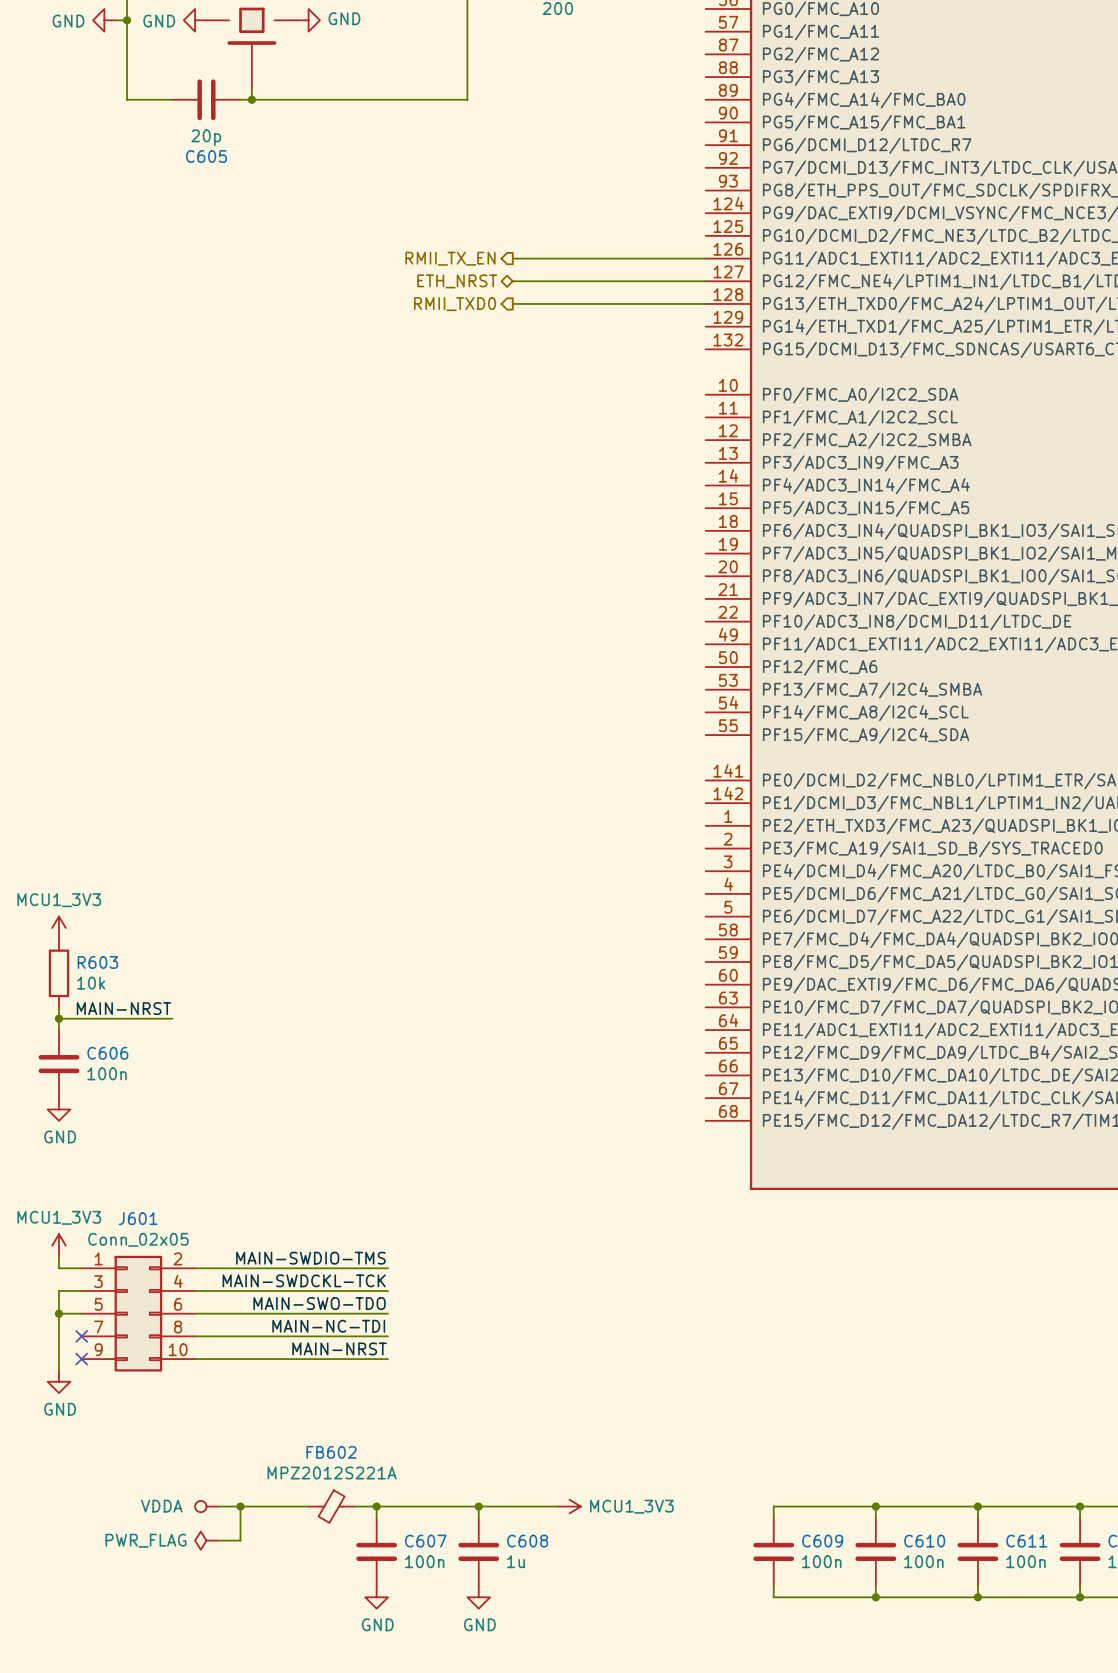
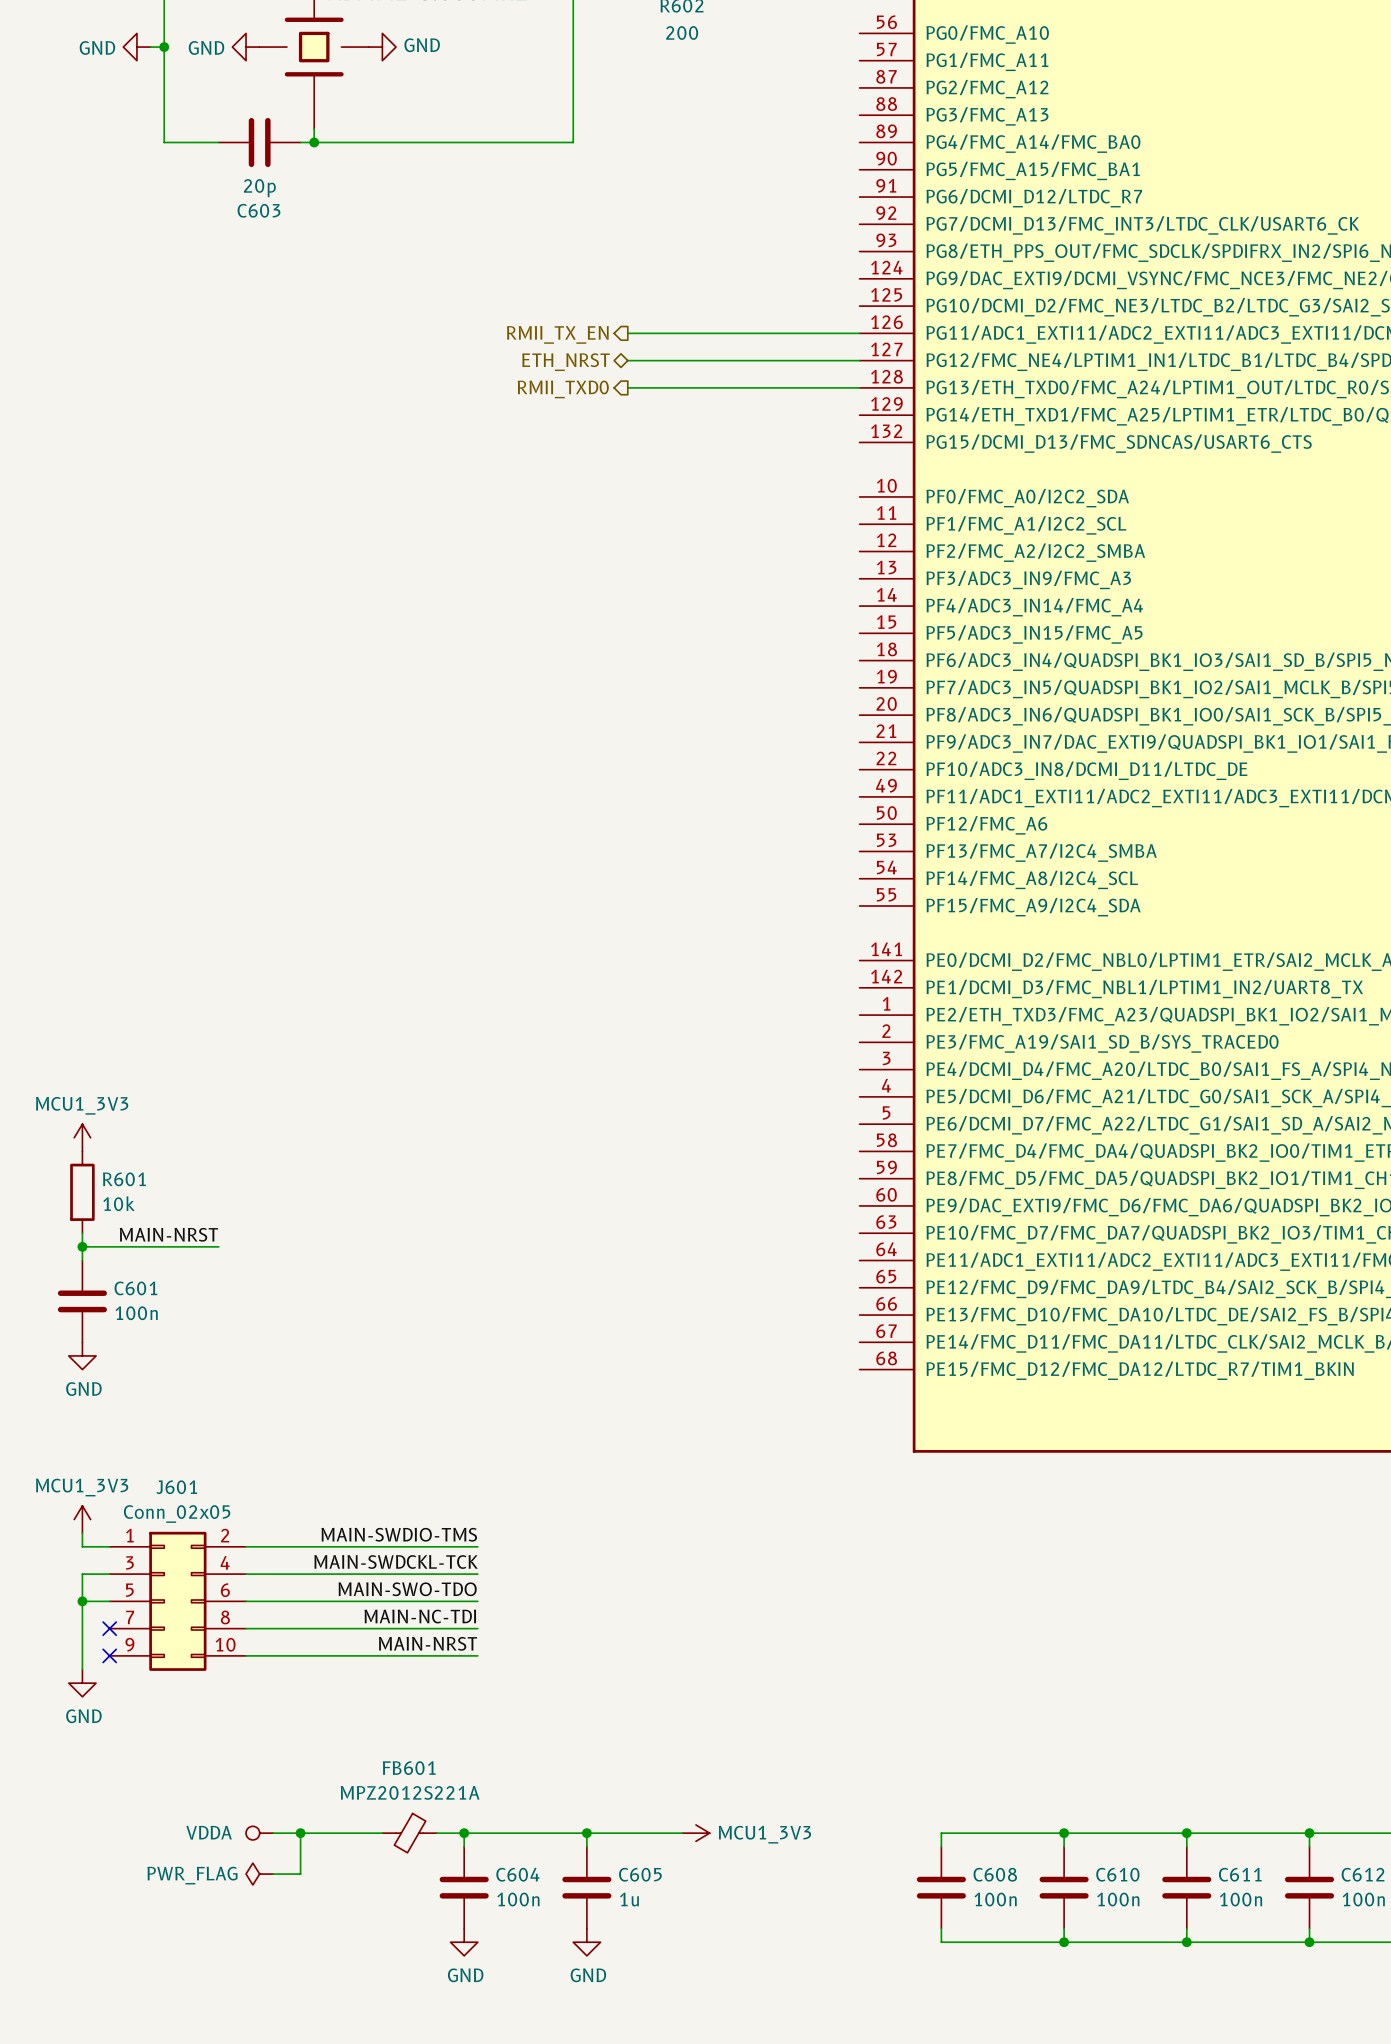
C605 name: C605 (206, 156) -> C603 (258, 210)
R603 name: R603 (97, 962) -> R601 (124, 1179)
C606 name: C606 (107, 1053) -> C601 (135, 1288)
FB602 name: FB602 (331, 1452) -> FB601 (409, 1768)
C607 name: C607 (425, 1541) -> C604 (517, 1874)
C608 name: C608 (527, 1541) -> C605 (640, 1874)
C609 name: C609 (822, 1541) -> C608 (995, 1874)

